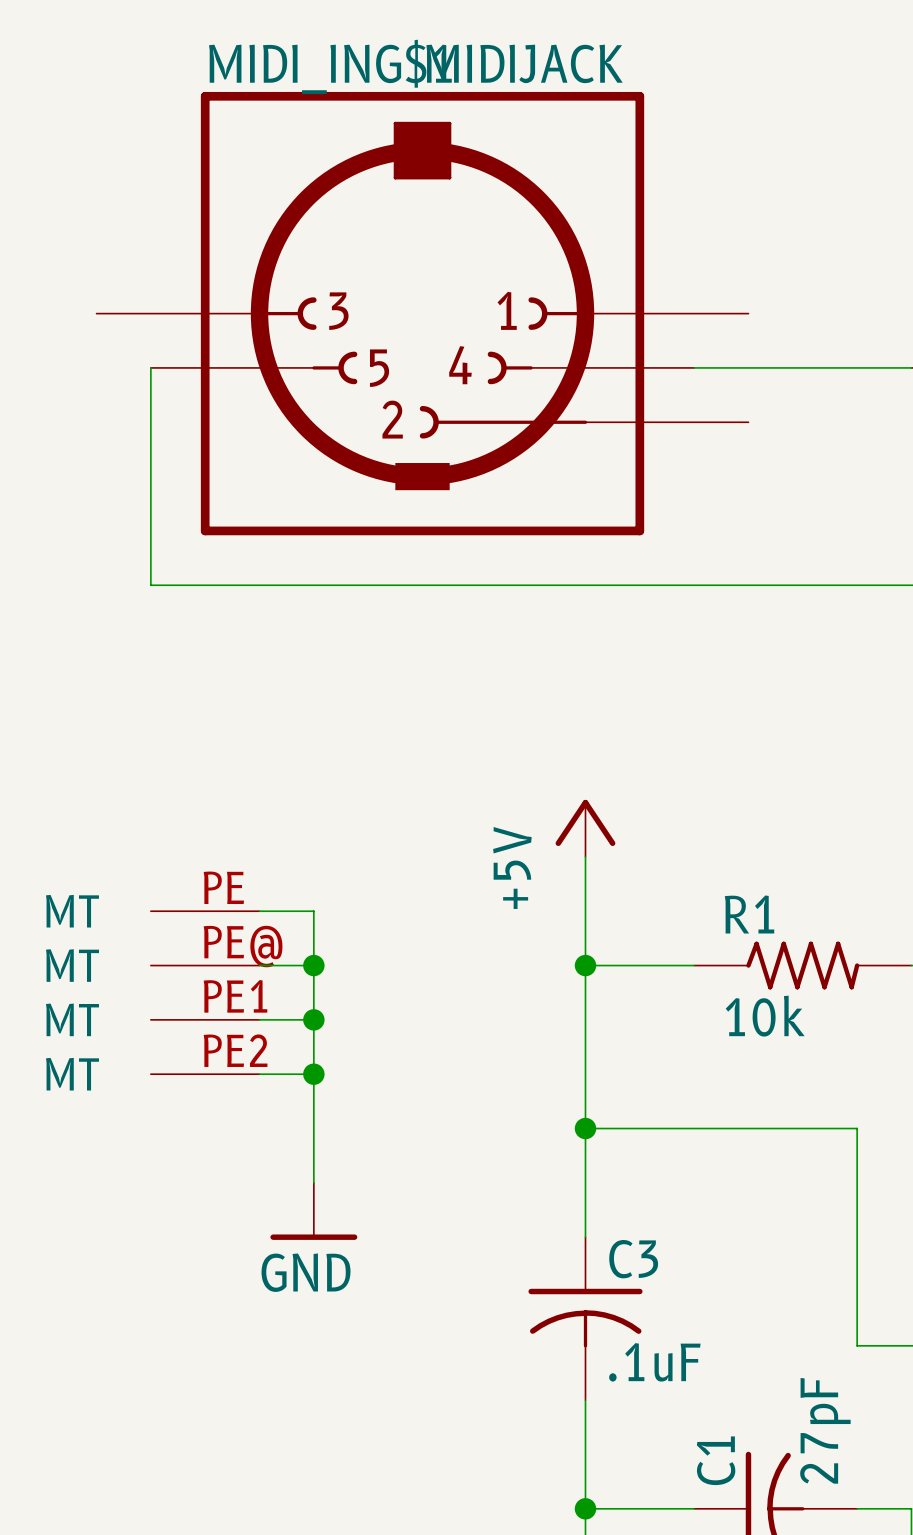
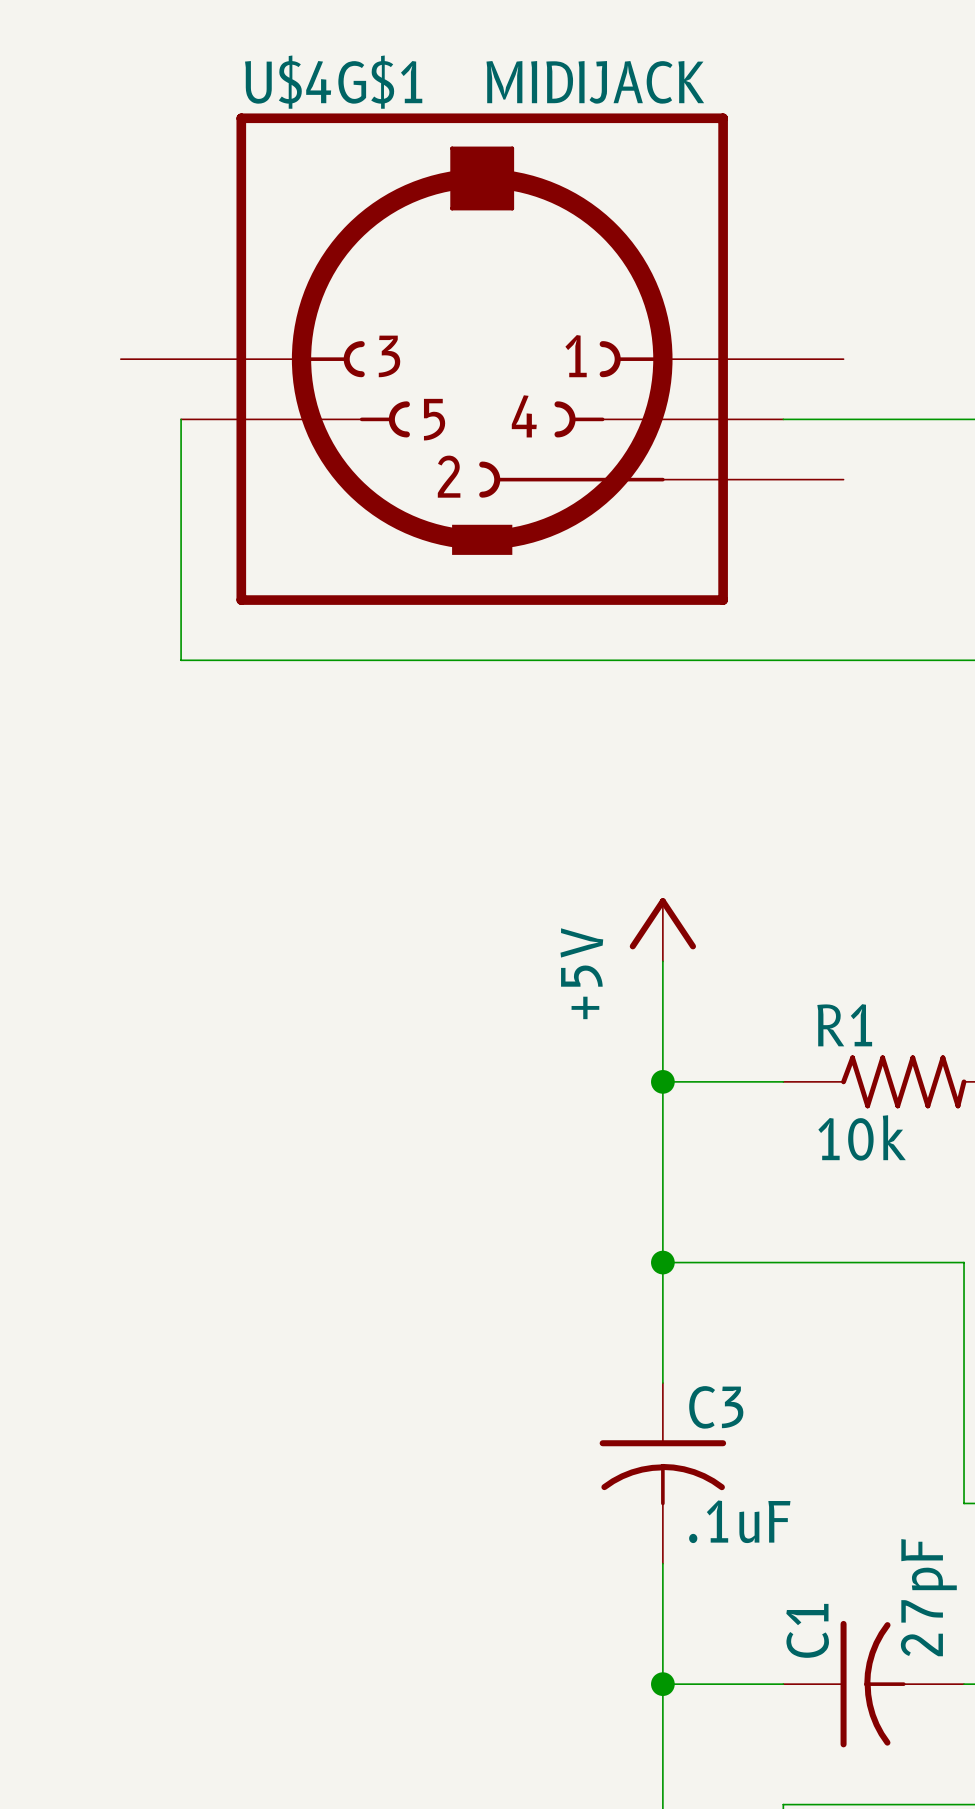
MIDI_ING$1 name: MIDI_ING$1 (330, 66) -> U$4G$1 (333, 82)
part: (205, 911) -> none
wire: (259, 911) (313, 911) (313, 1182) -> none
part: (205, 965) -> none
wire: (259, 965) (313, 965) -> none
junction: (313, 965) -> none
part: (205, 1019) -> none
wire: (259, 1019) (313, 1019) -> none
junction: (313, 1019) -> none
part: (205, 1074) -> none
wire: (259, 1074) (313, 1074) -> none
junction: (313, 1074) -> none
power symbol: GND (313, 1211) -> none

